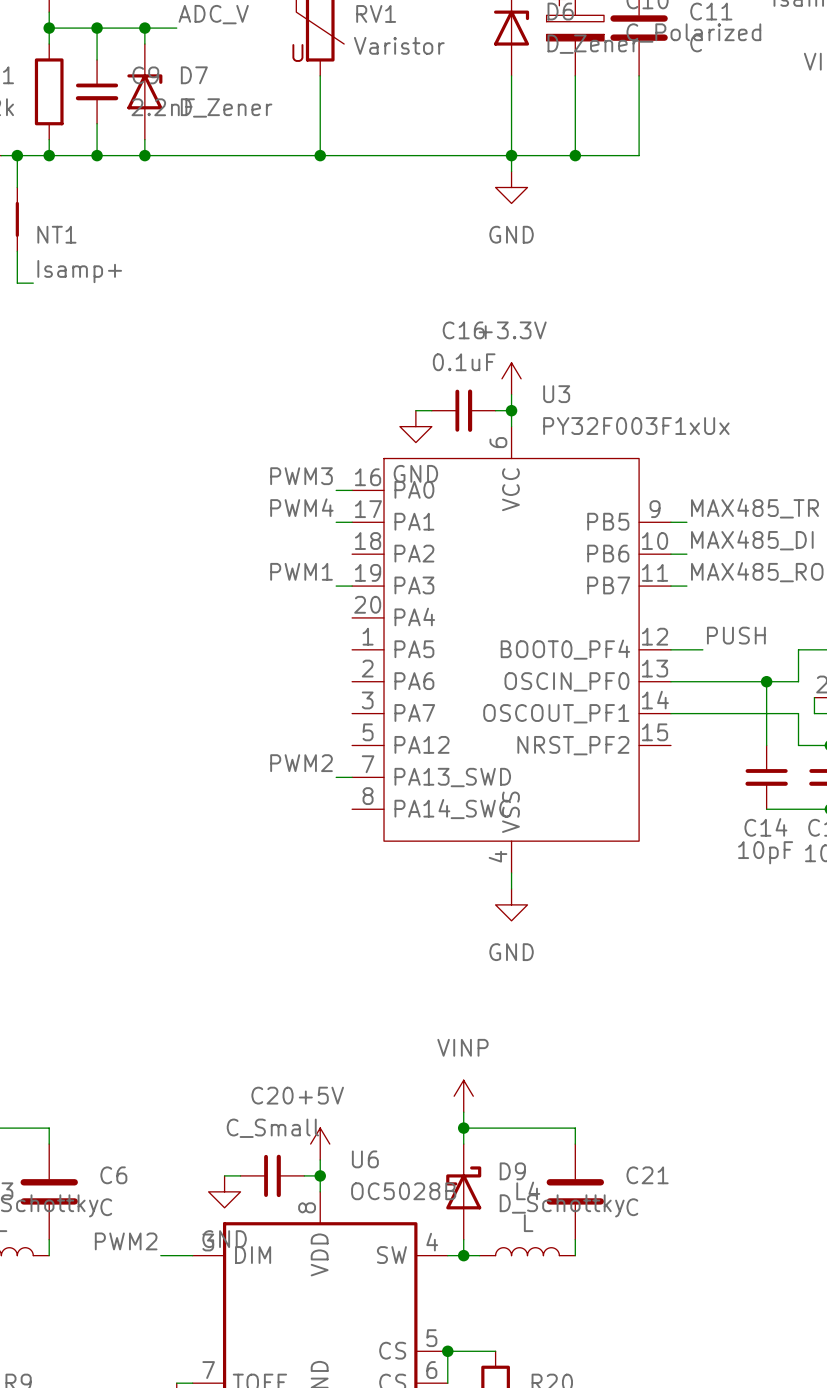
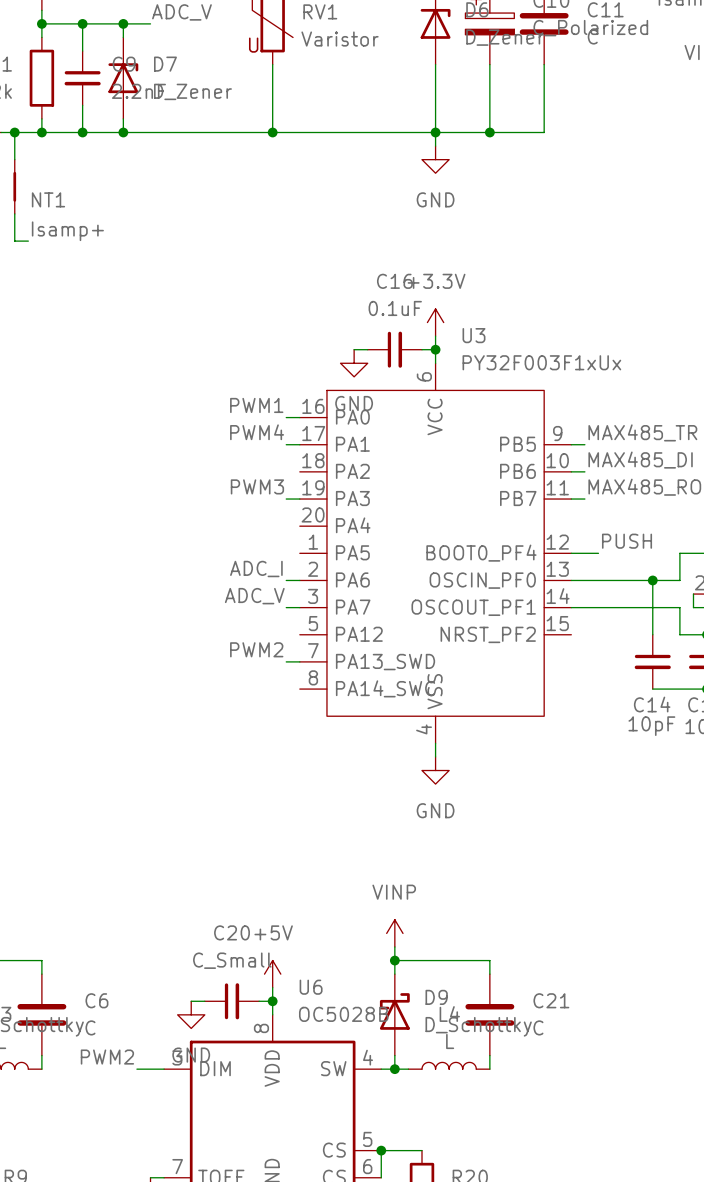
label: PWM3 (301, 476) -> PWM1 (256, 405)
label: PWM1 (301, 571) -> PWM3 (257, 486)
label: none -> ADC_I (256, 569)
wire: none -> (286, 580) (299, 580)
label: none -> ADC_V (254, 596)
wire: none -> (286, 607) (299, 607)

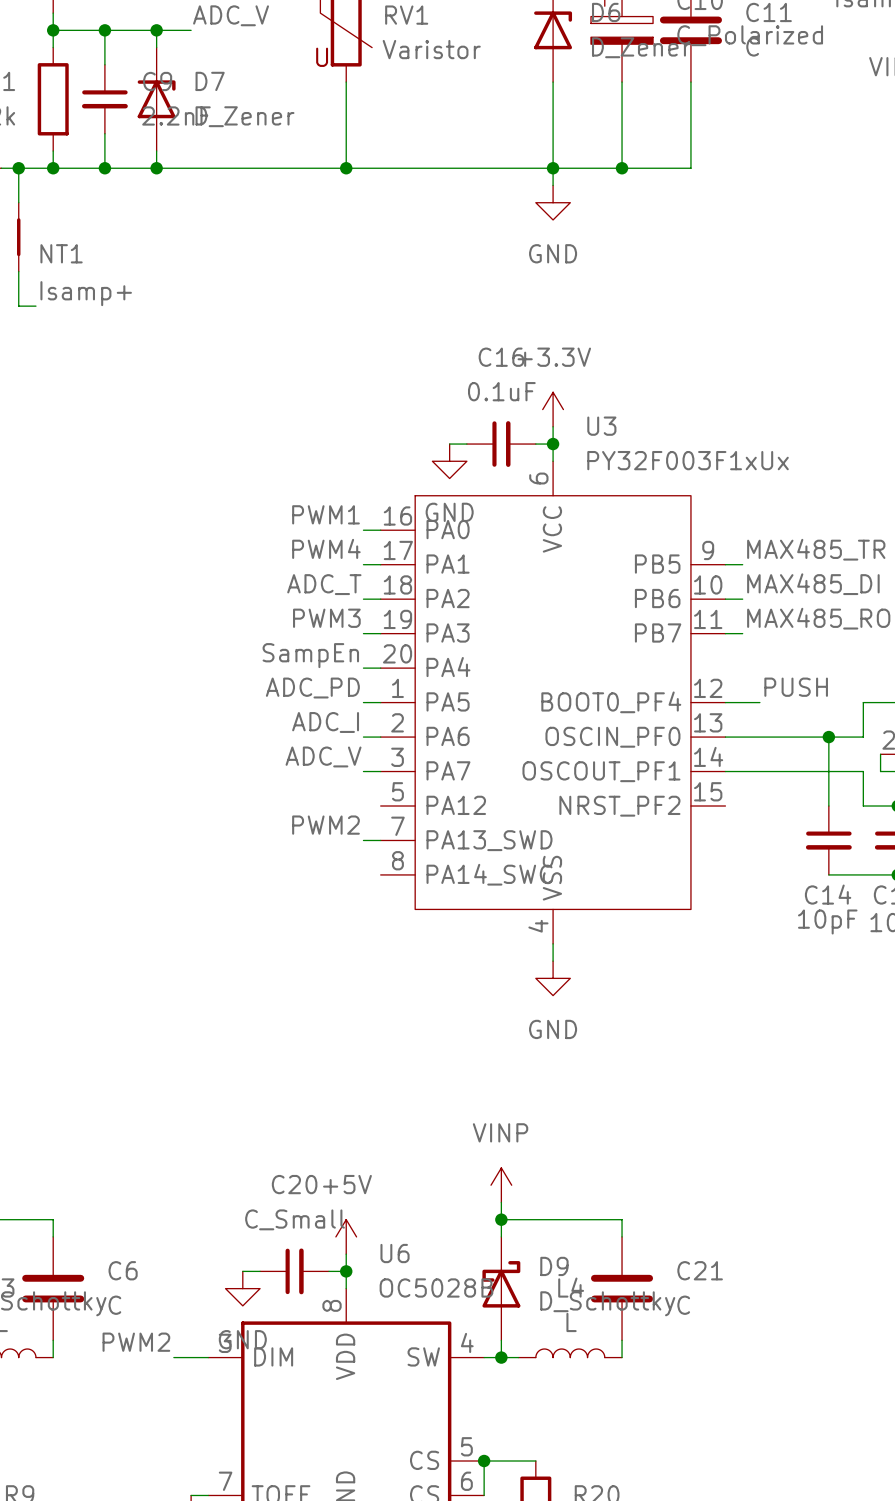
label: none -> ADC_T (324, 584)
wire: none -> (363, 599) (380, 599)
label: none -> SampEn (310, 655)
wire: none -> (363, 668) (380, 668)
label: none -> ADC_PD (312, 688)
wire: none -> (363, 702) (380, 702)

